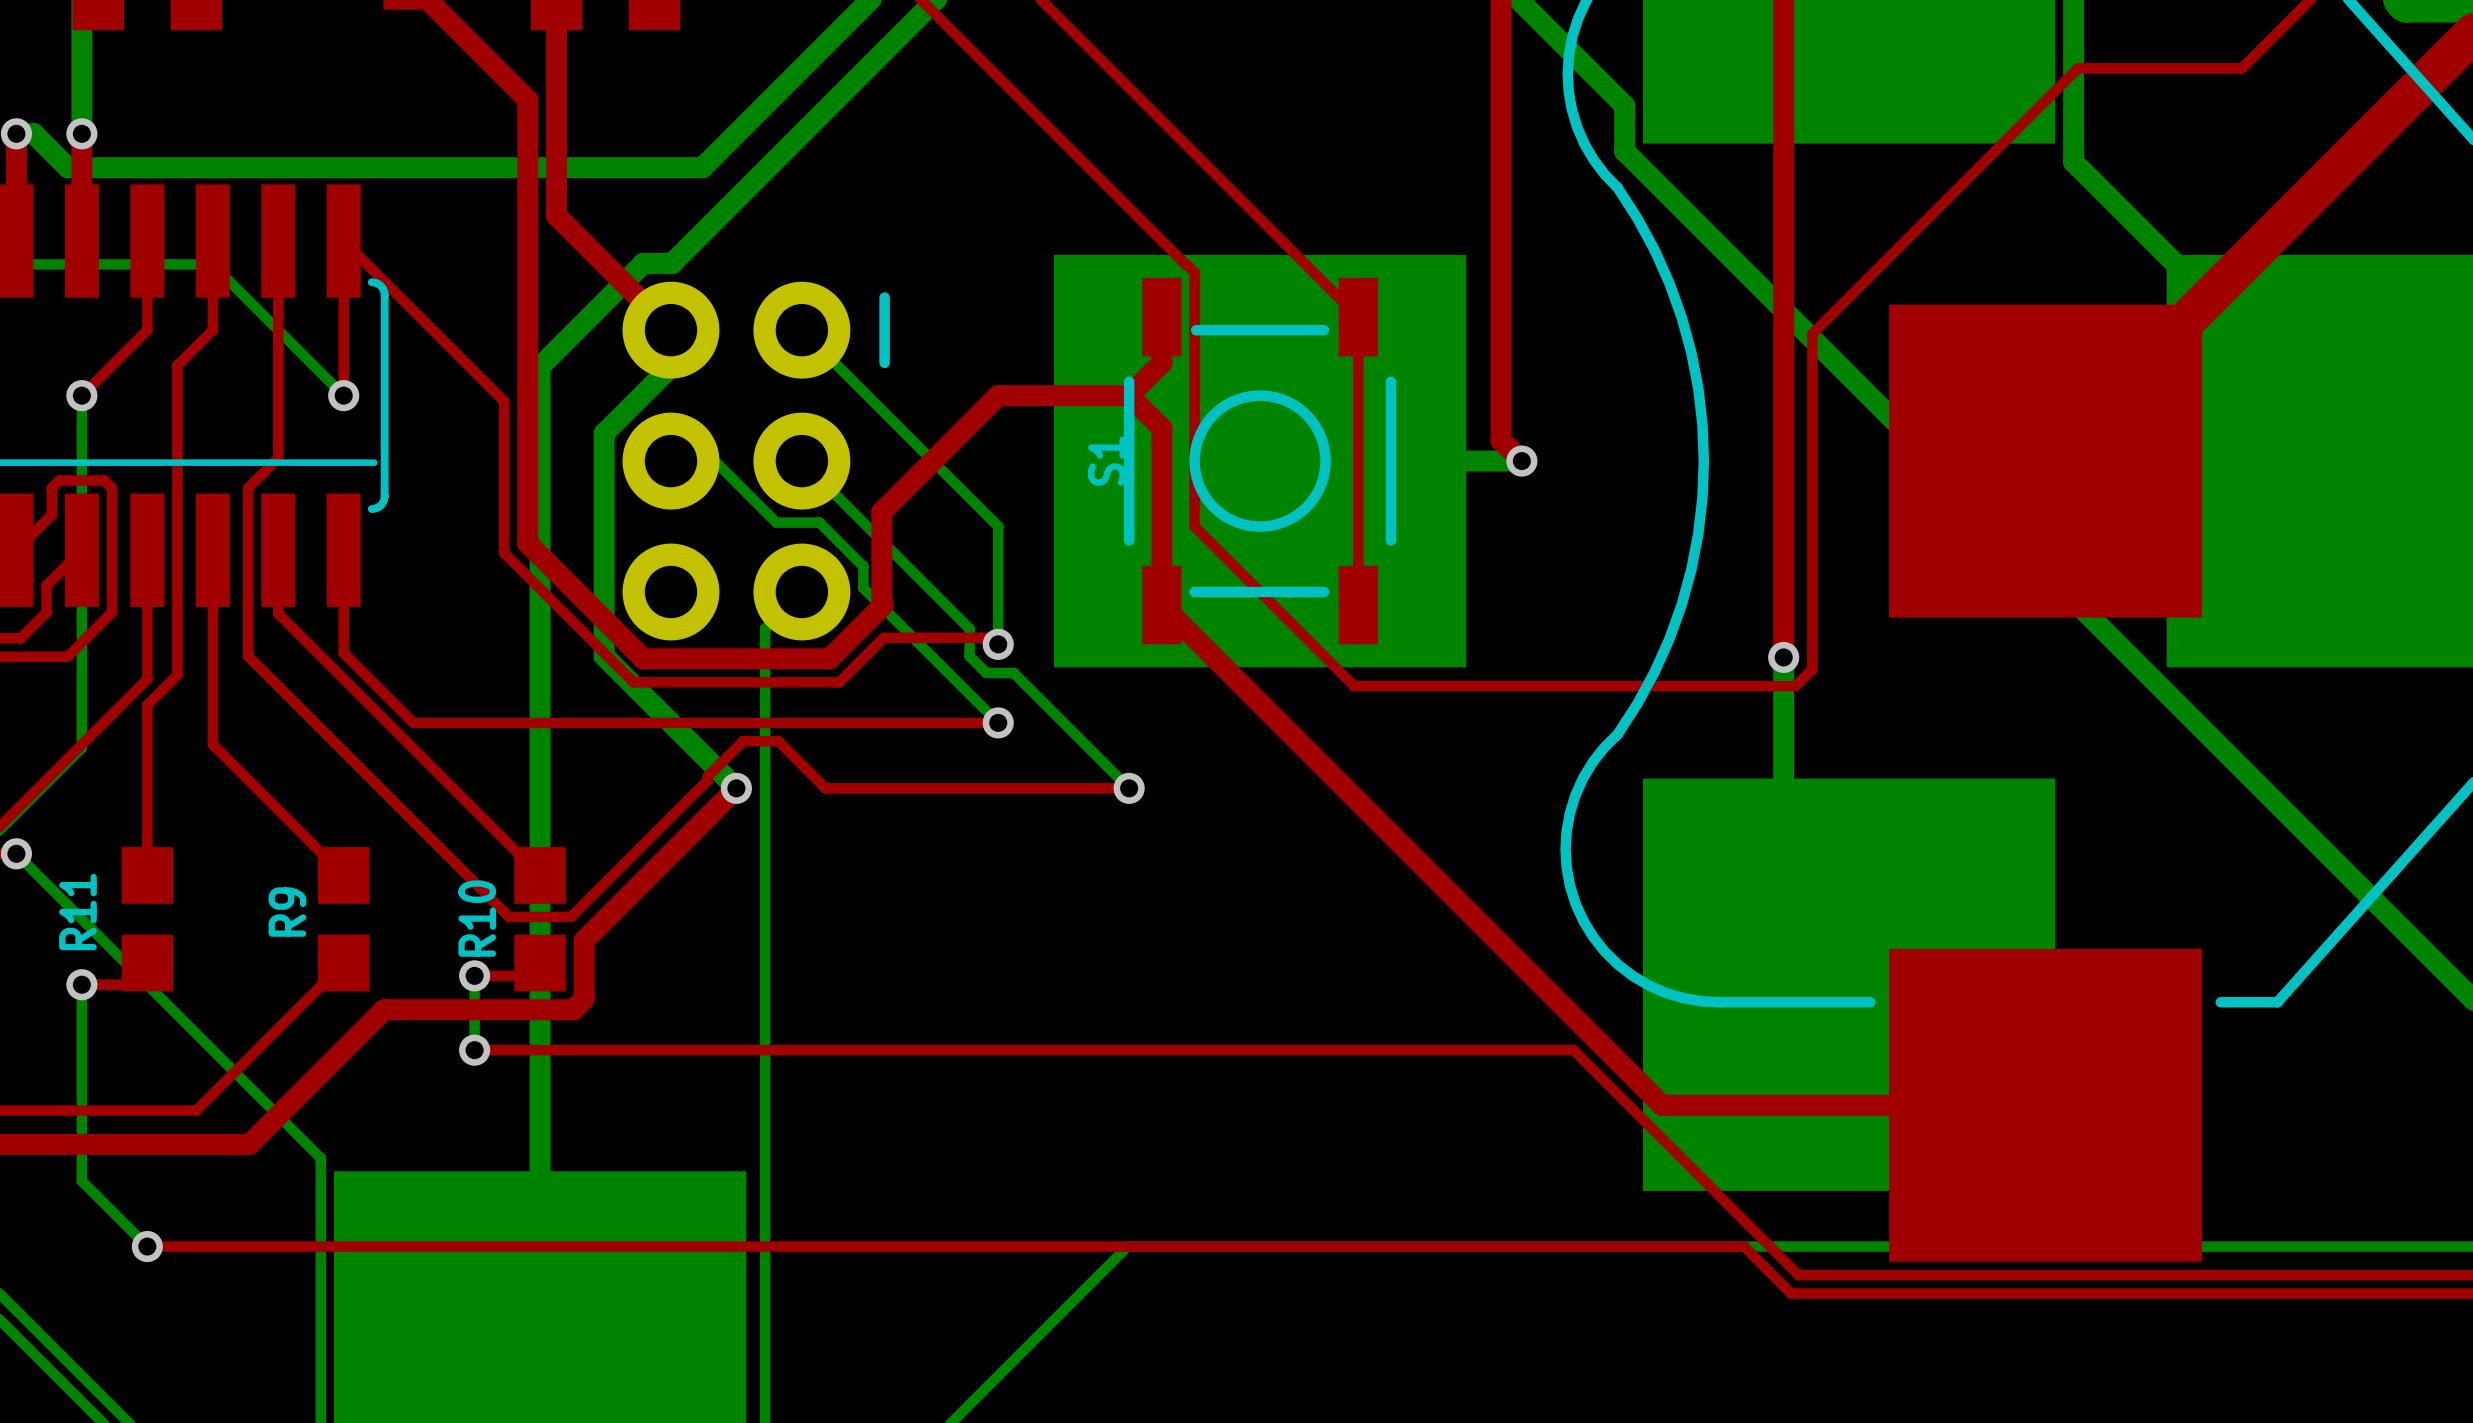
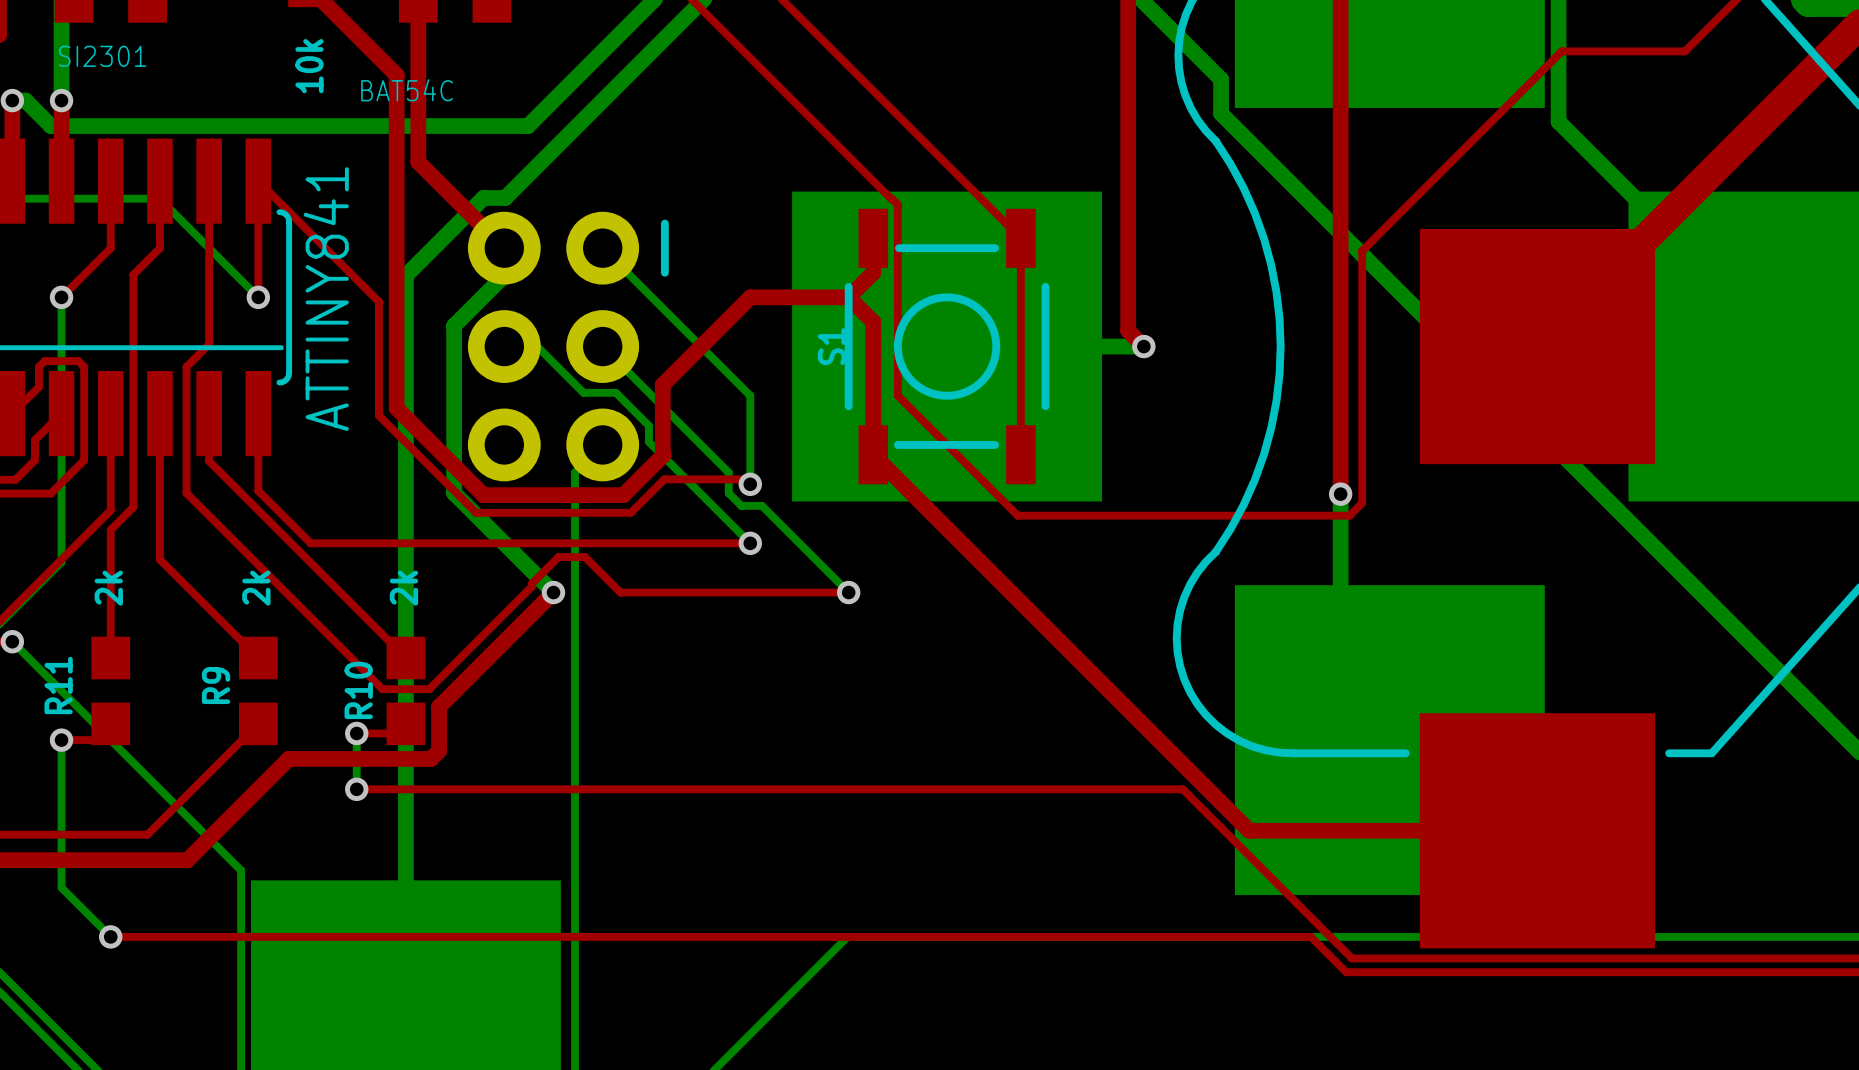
part value: none -> SI2301 (102, 56)
part value: none -> 10k (309, 66)
part value: none -> BAT54C (407, 90)
part value: none -> ATTINY841 (326, 299)
R11 value: none -> 2k (108, 588)
R9 value: none -> 2k (256, 588)
R10 value: none -> 2k (403, 588)

